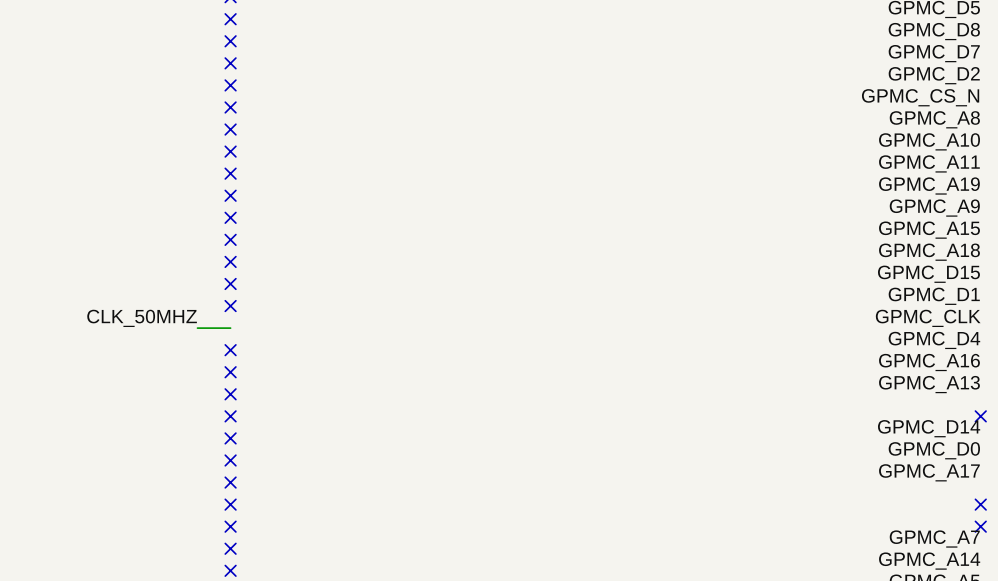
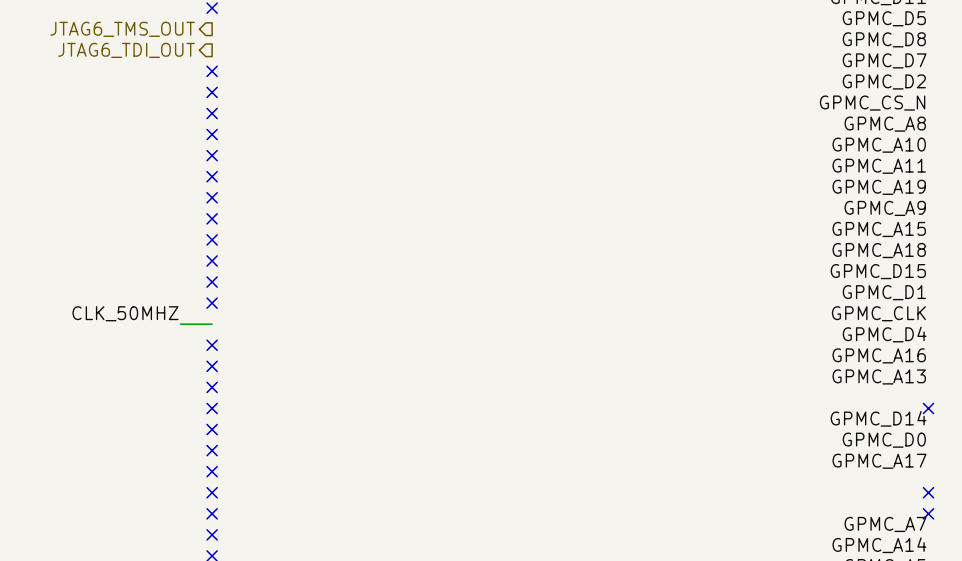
no-connect mark: (230, 19) -> none
hierarchical label: none -> JTAG6_TMS_OUT (122, 29)
no-connect mark: (230, 41) -> none
hierarchical label: none -> JTAG6_TDI_OUT (126, 50)

